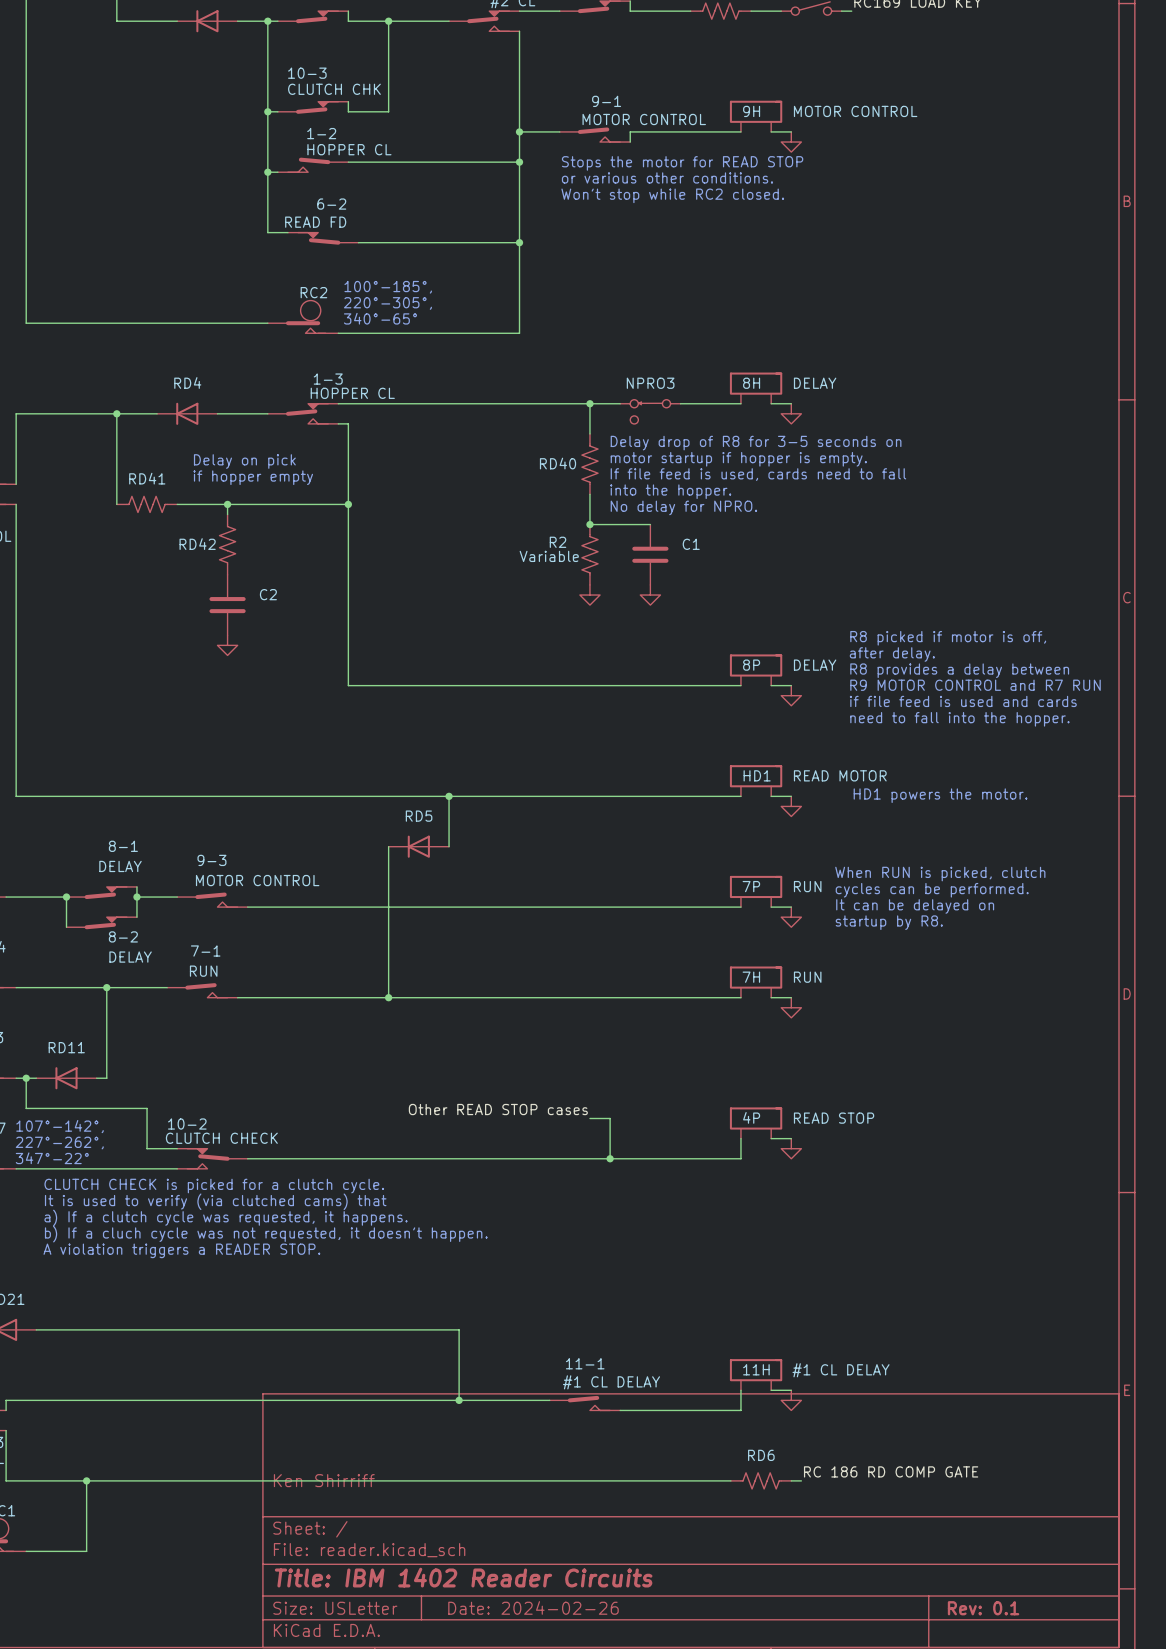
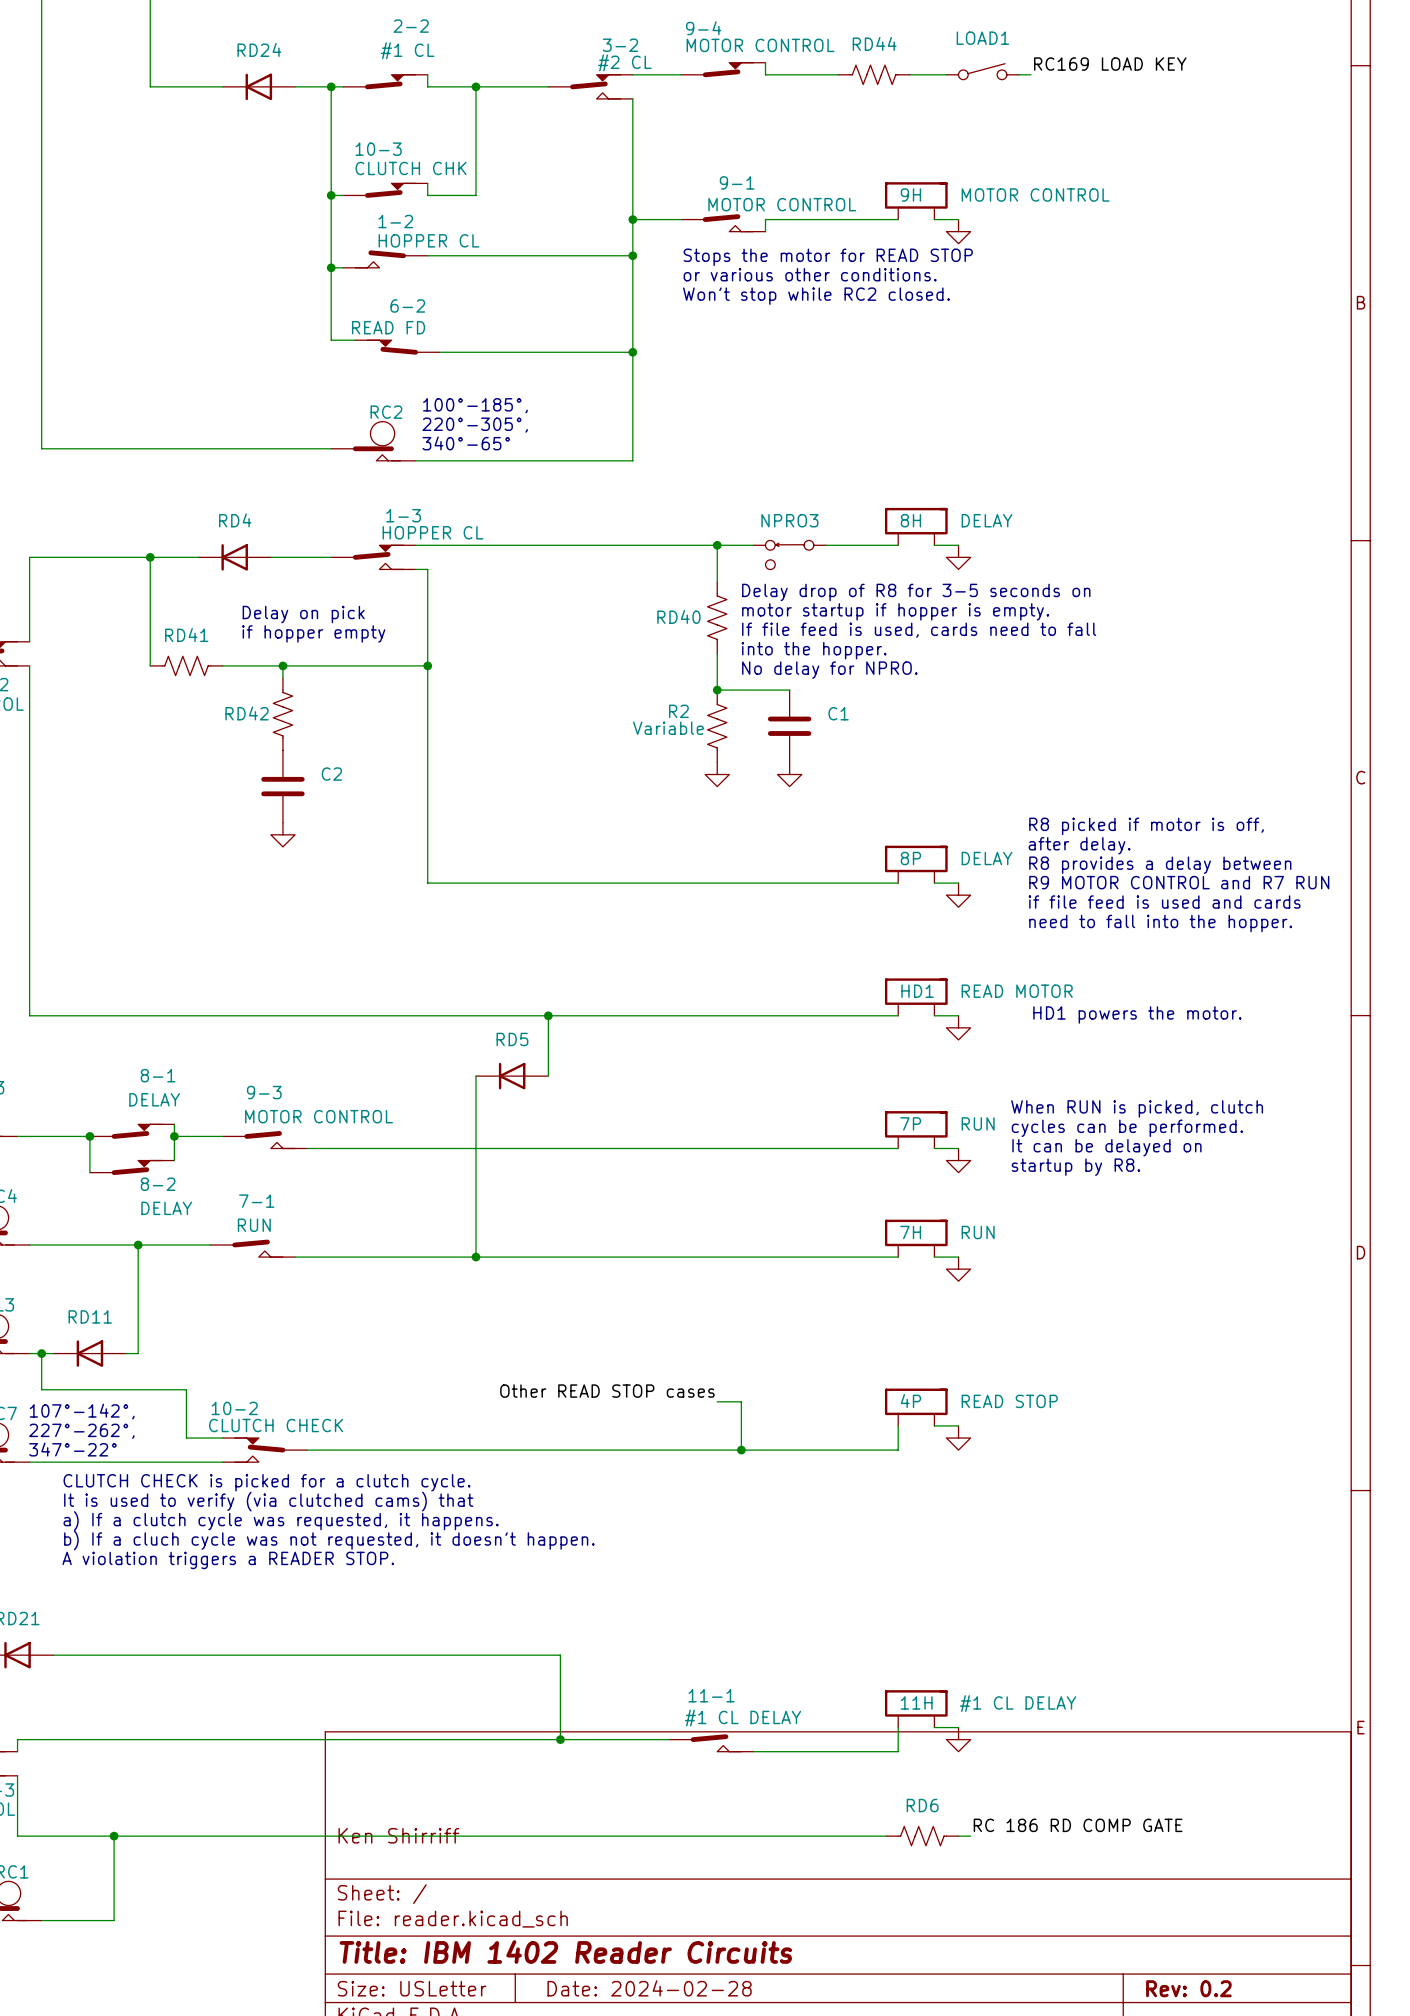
title block: Date: 2024-02-26 (533, 1607) -> Date: 2024-02-28 (649, 1988)
title block: Rev: 0.1 (983, 1608) -> Rev: 0.2 (1188, 1988)

